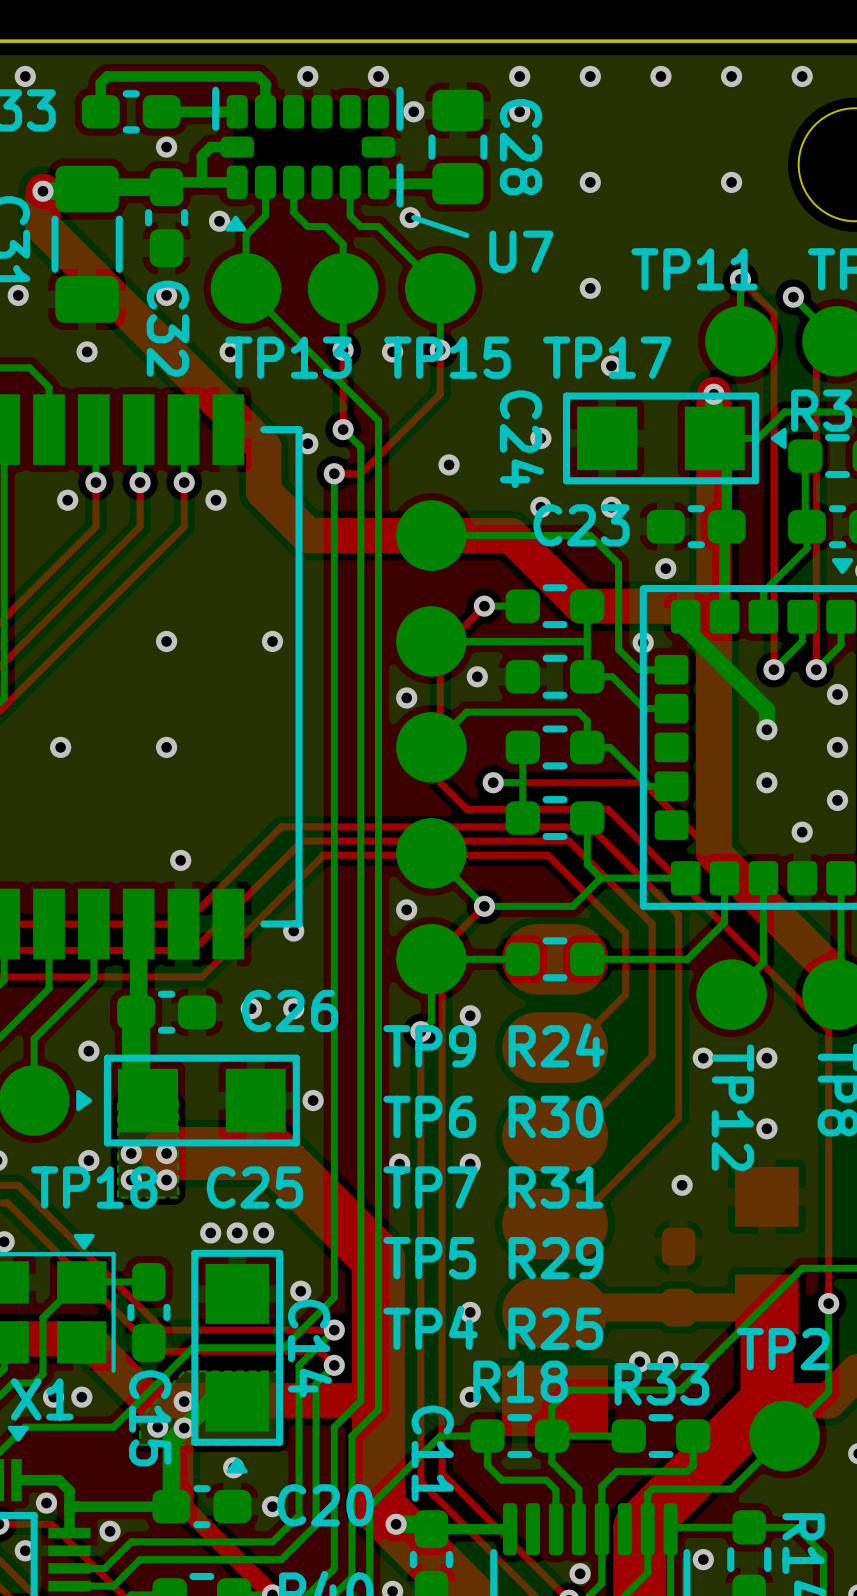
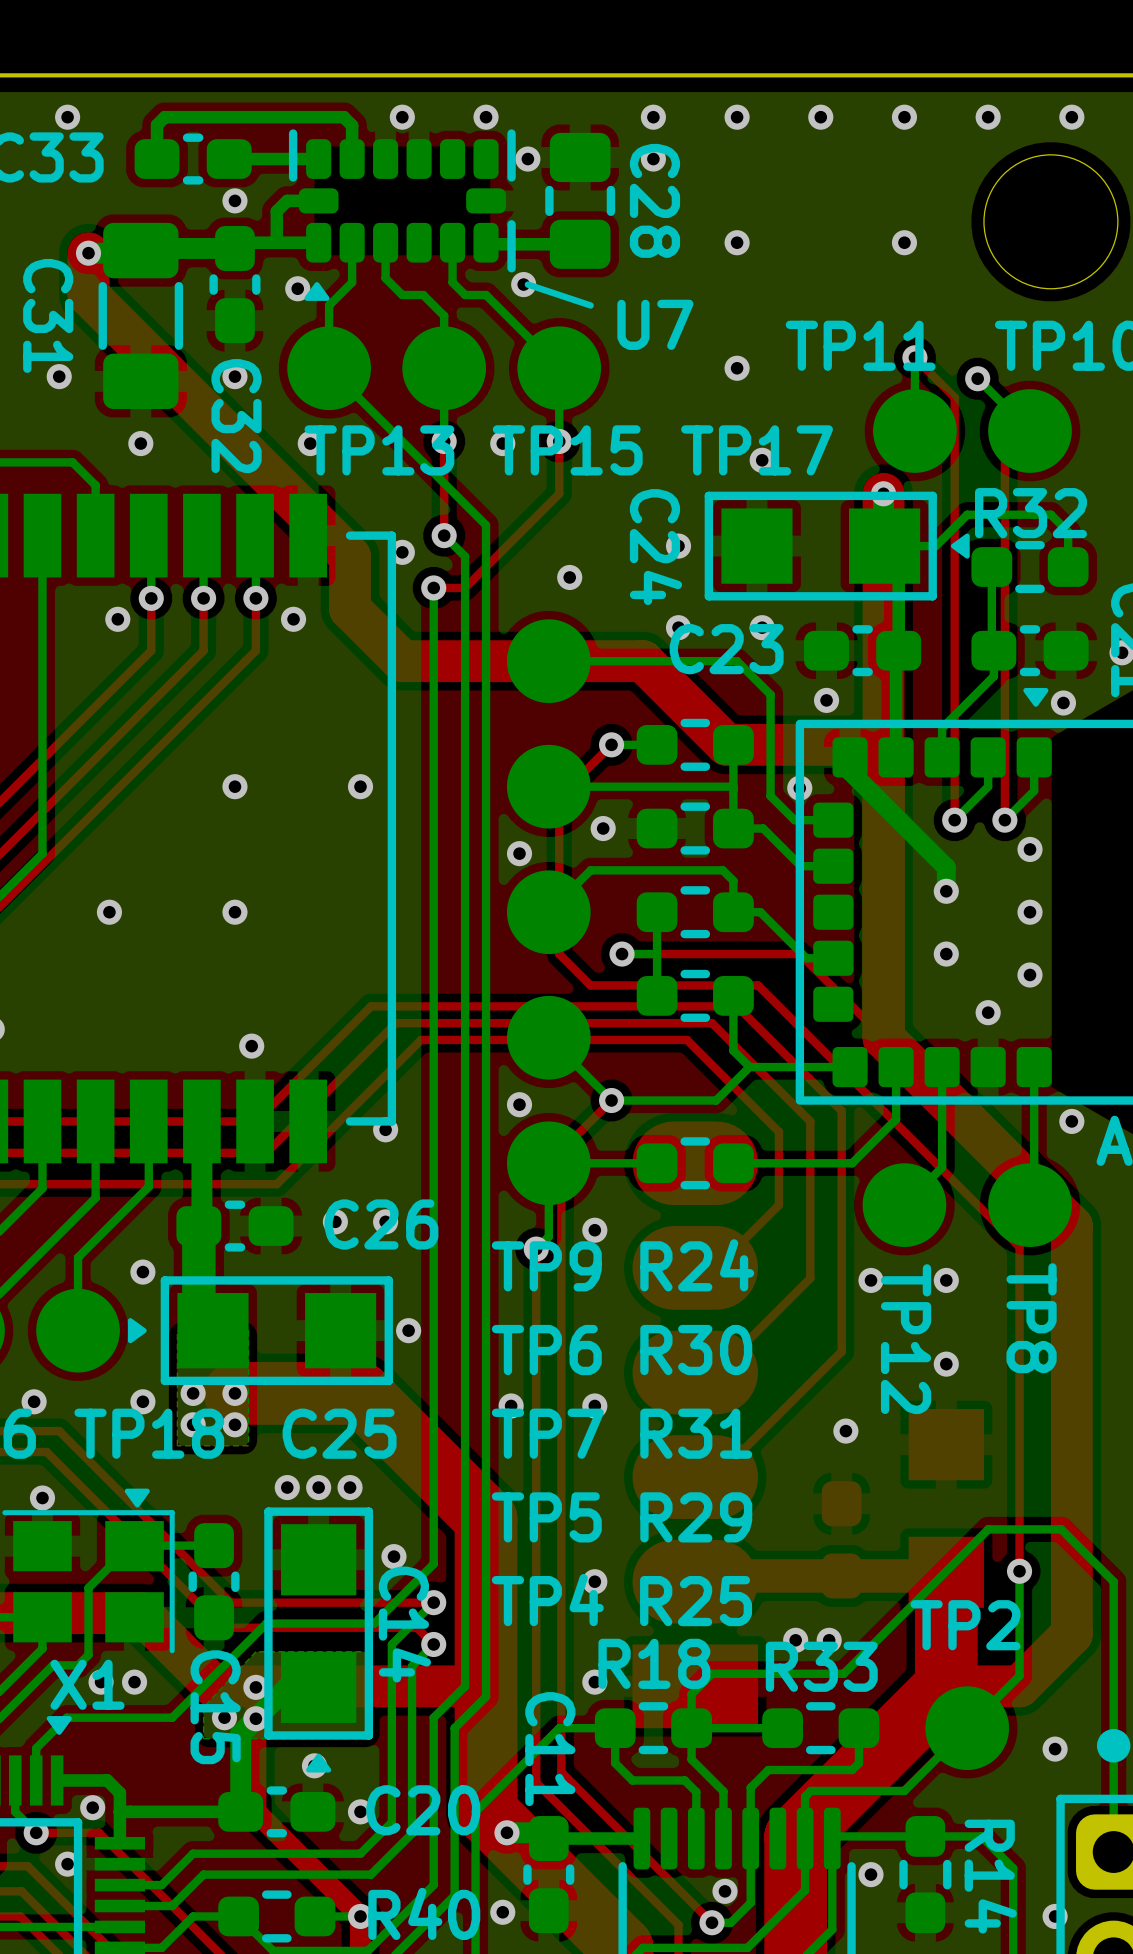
via: (110, 1531) -> none

